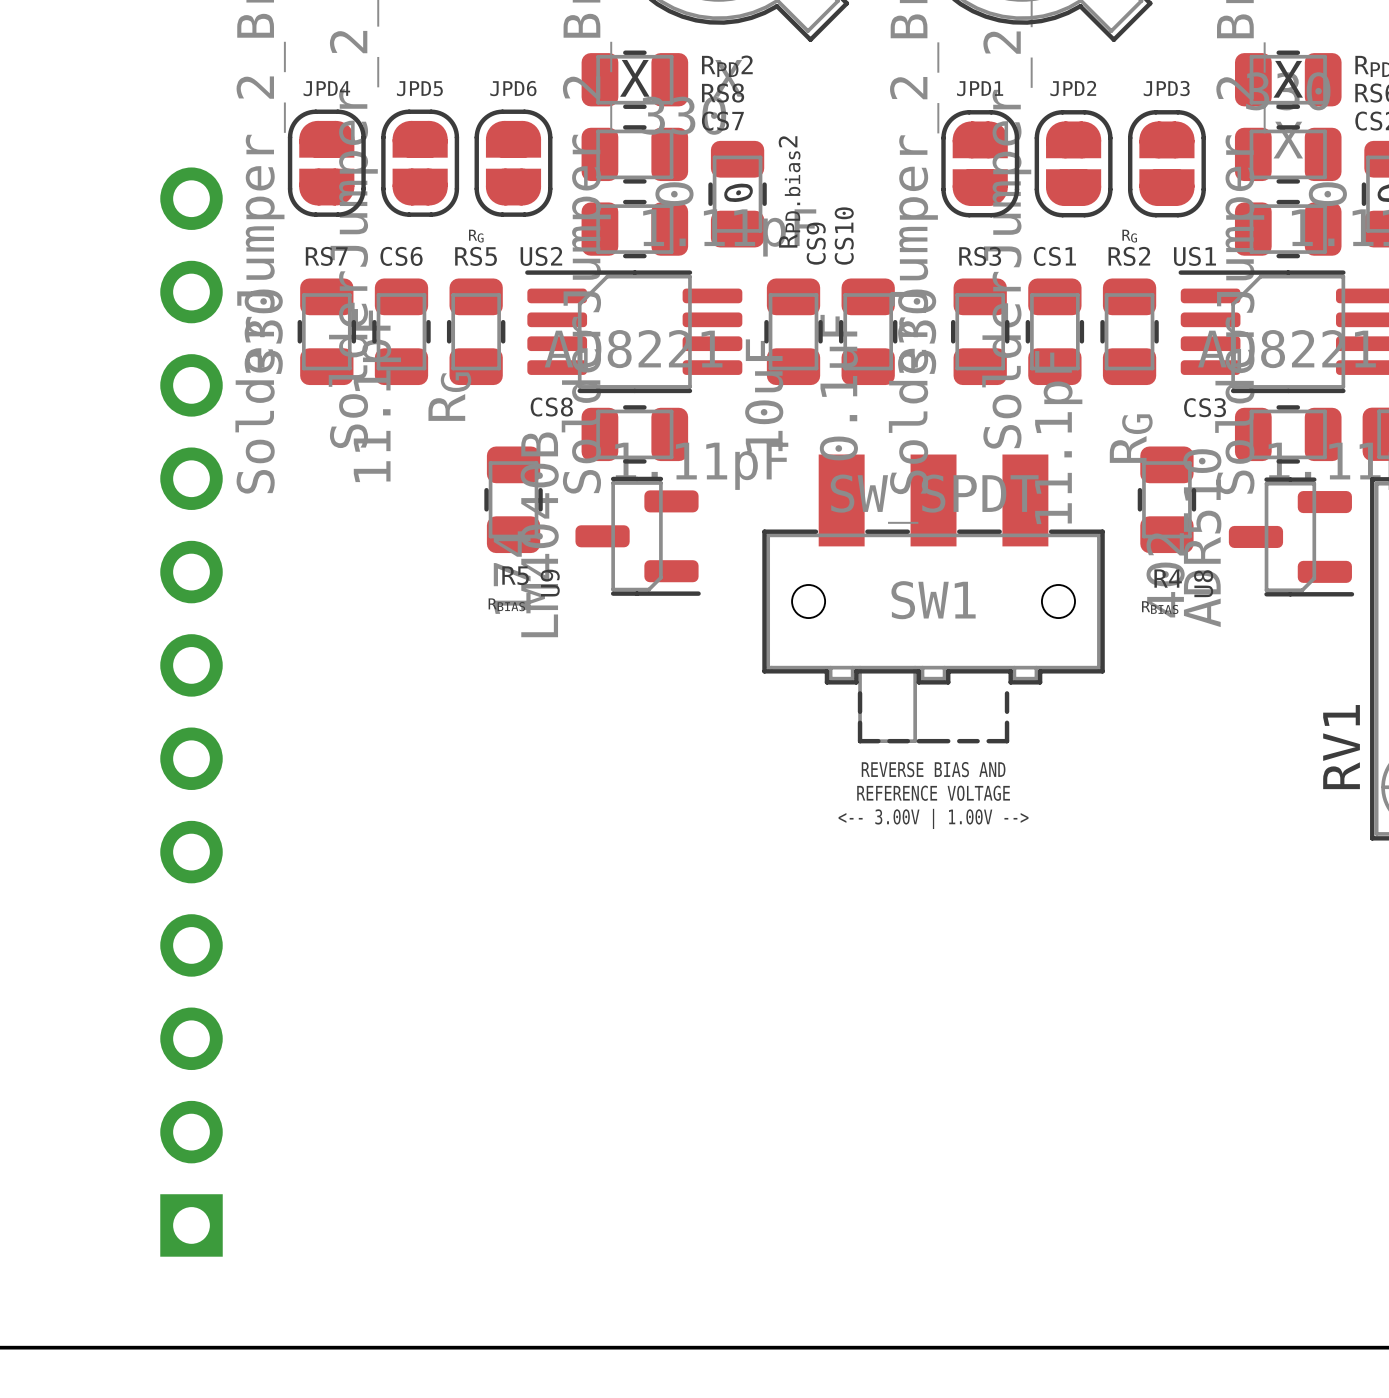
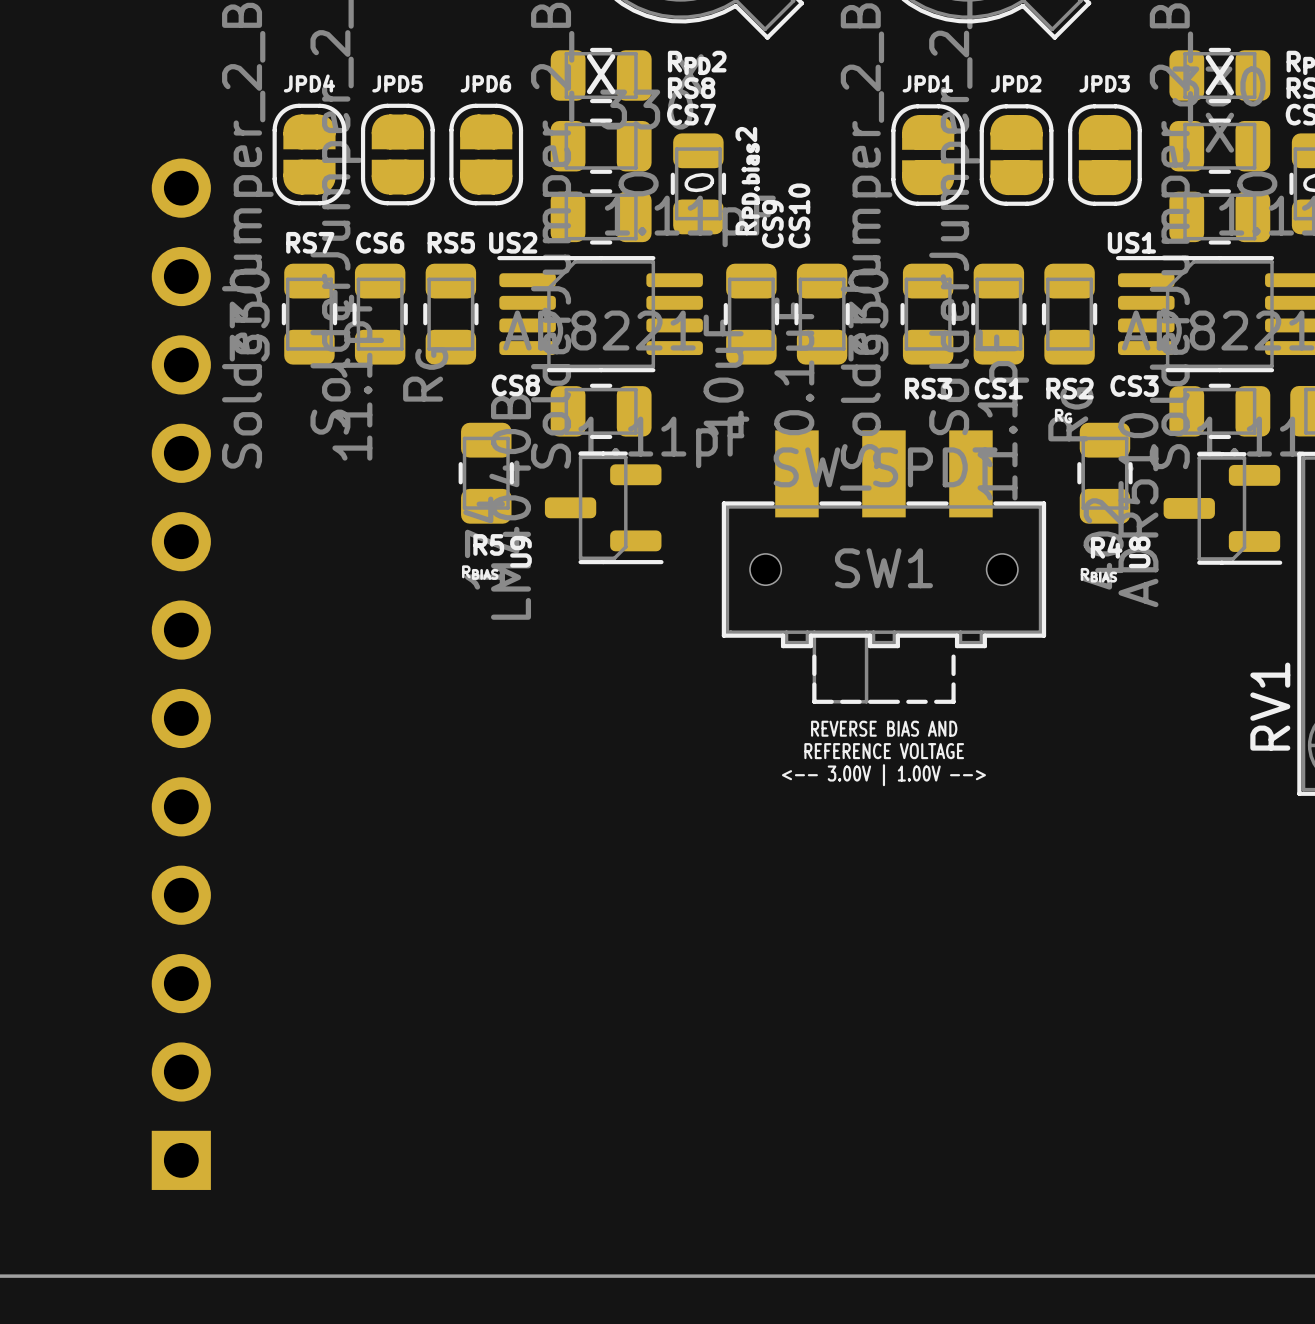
text: RG (476, 236) -> none
text position: RG (1129, 236) -> RG (1063, 416)
RS3 name position: RS3 (980, 256) -> RS3 (928, 388)
CS1 name position: CS1 (1054, 256) -> CS1 (998, 388)
RS2 name position: RS2 (1129, 256) -> RS2 (1069, 388)

